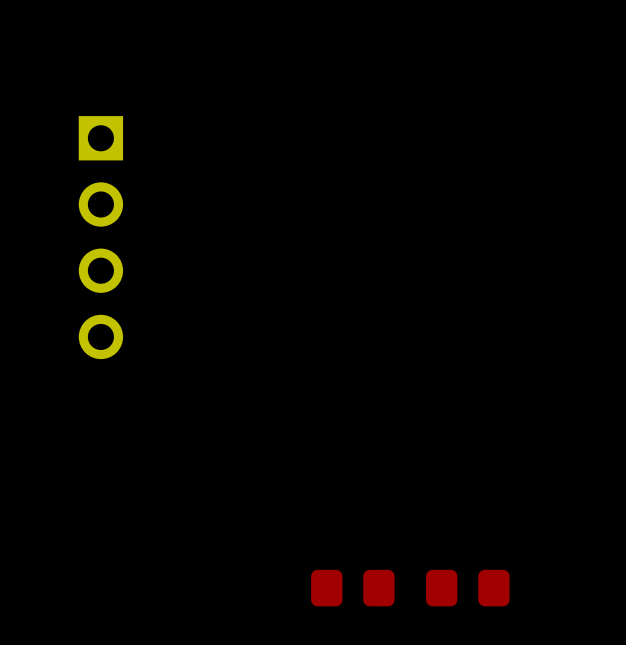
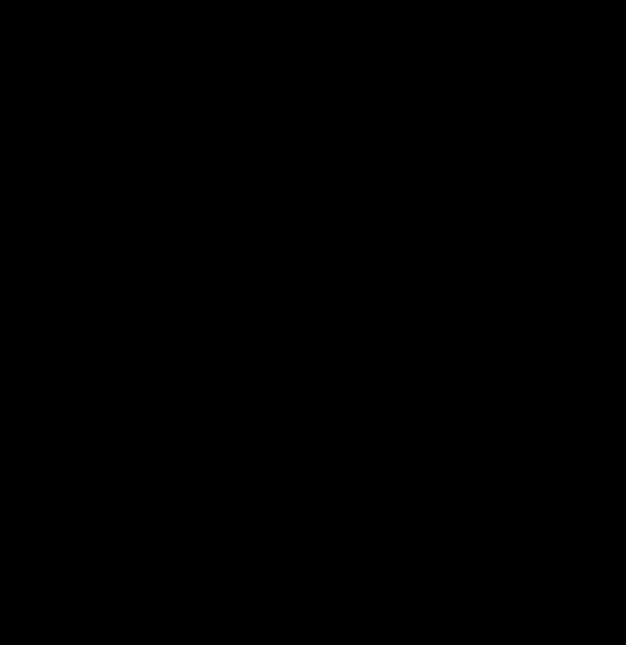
part: (100, 237) -> none
part: (352, 588) -> none
part: (467, 588) -> none

